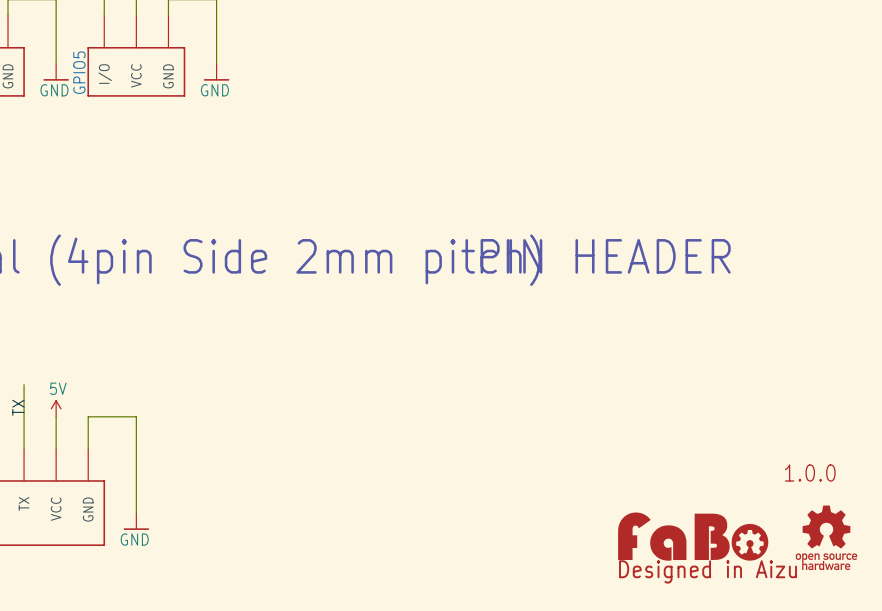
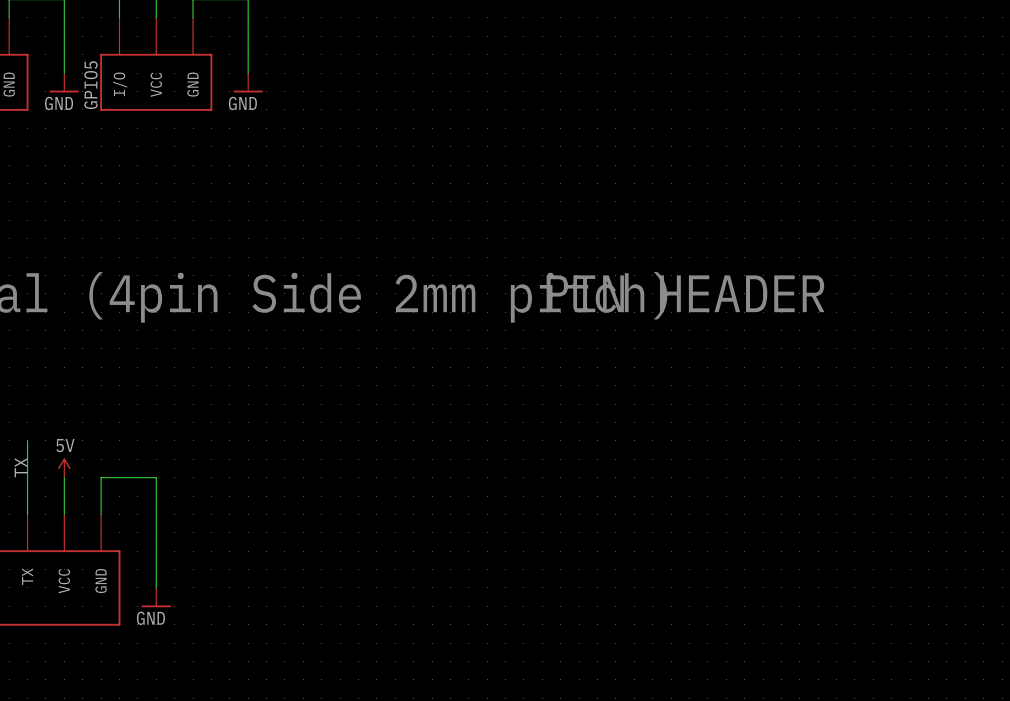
text: 1.0.0 (810, 472) -> none
part: (693, 536) -> none
part: (826, 537) -> none

